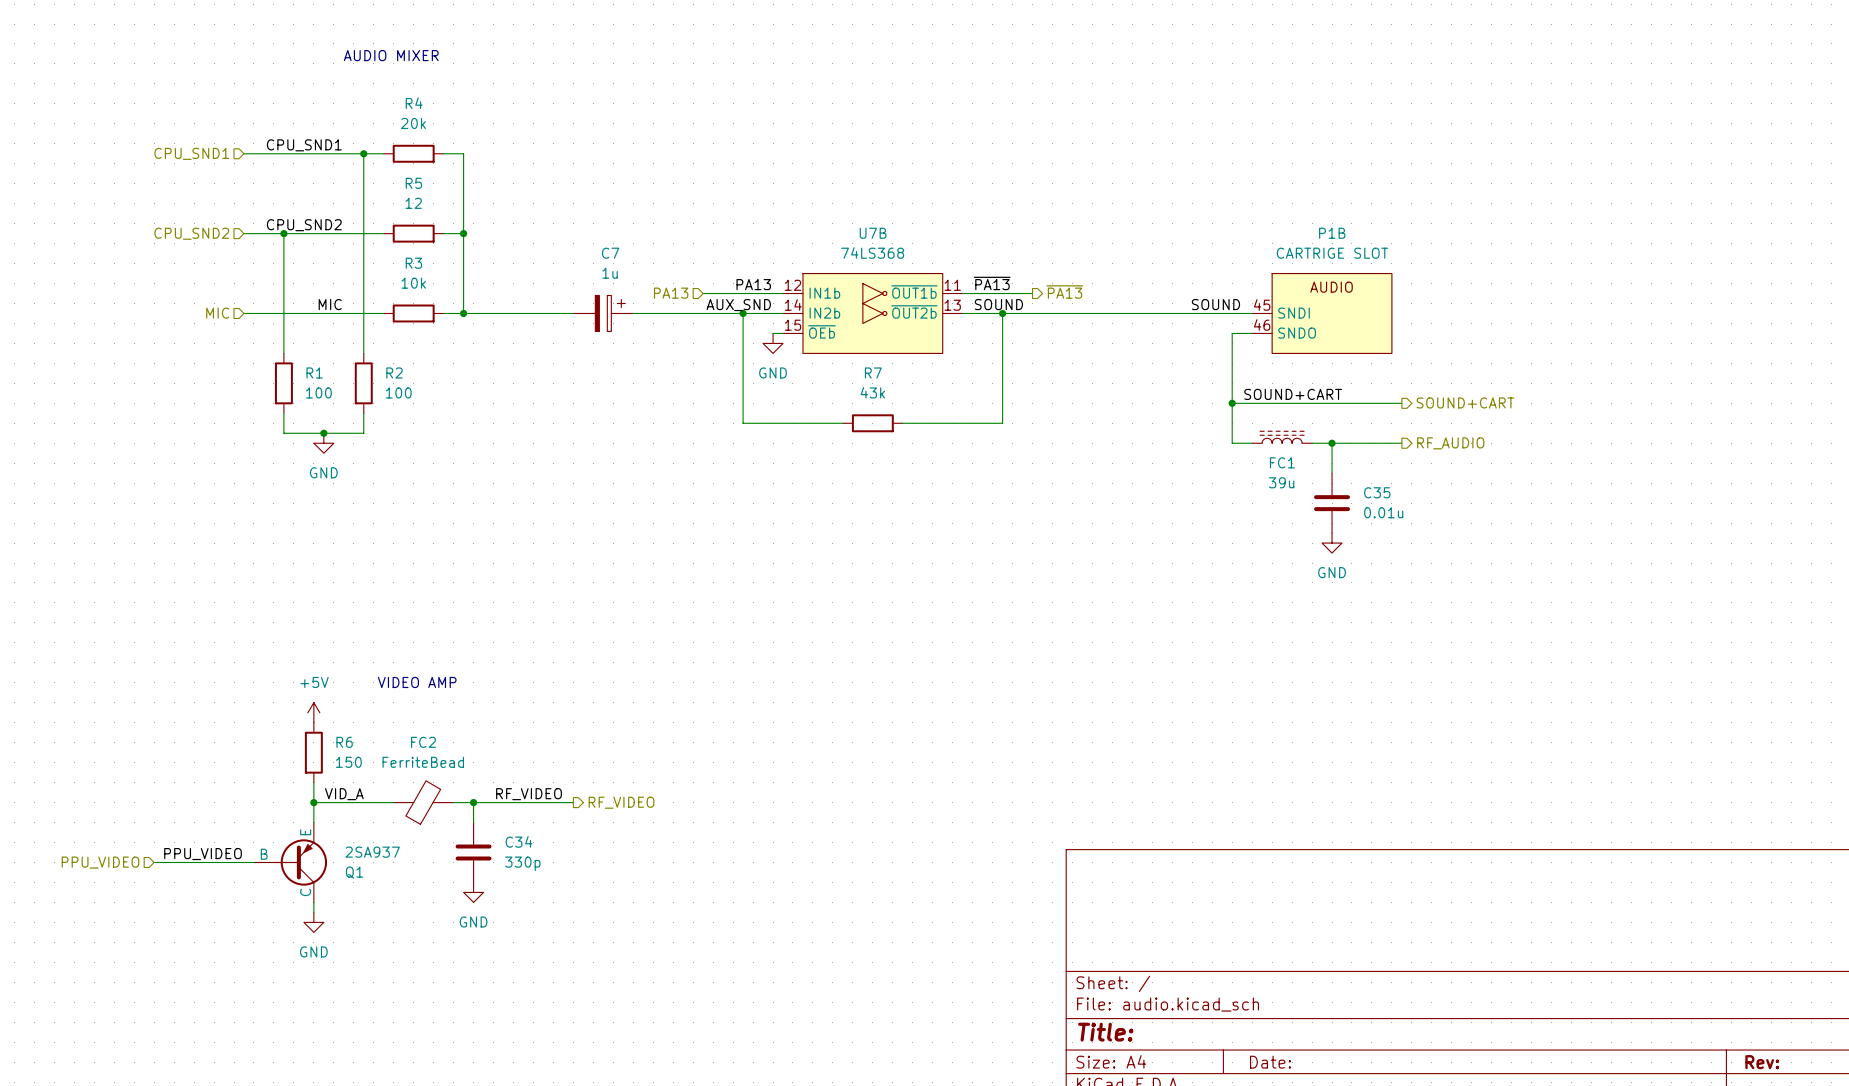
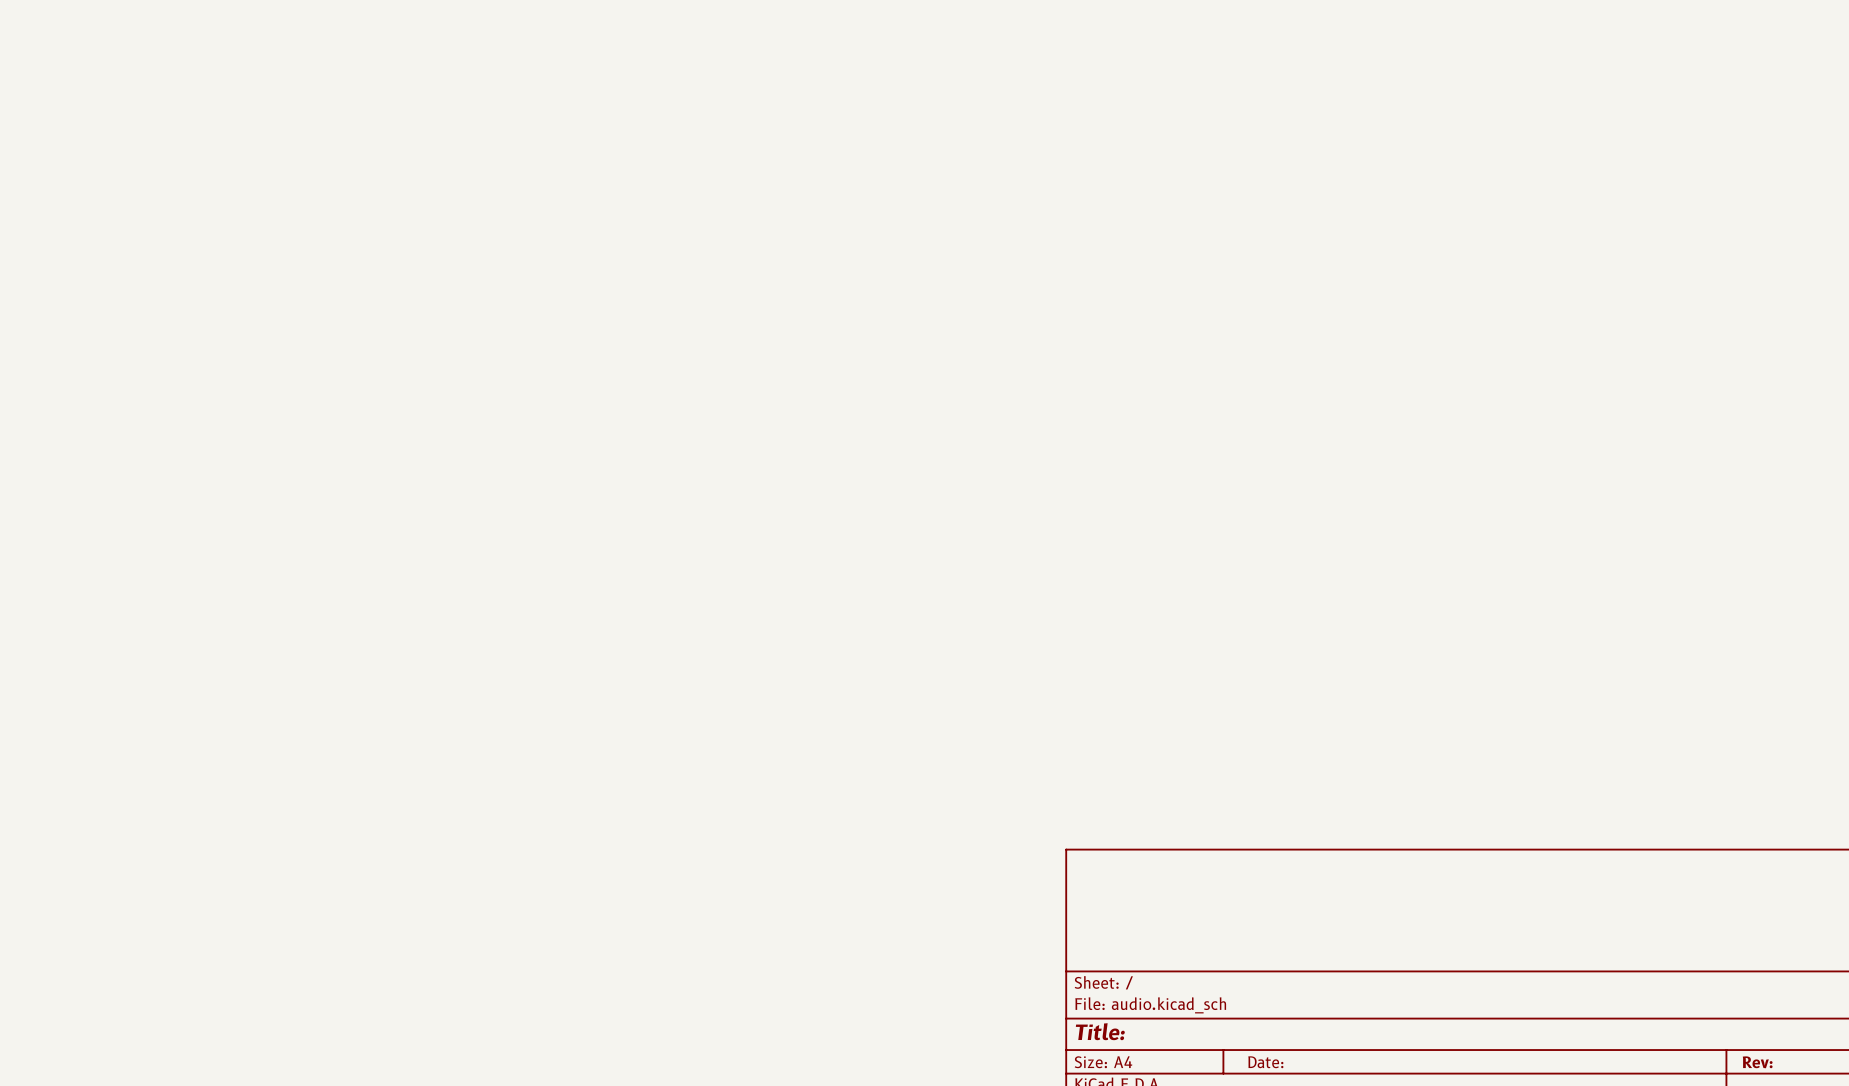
text: AUDIO MIXER (391, 55) -> none
label: CPU_SND1 (304, 145) -> none
hierarchical label: CPU_SND1 (191, 153) -> none
wire: (243, 153) (383, 153) -> none
wire: (363, 153) (363, 353) -> none
junction: (363, 153) -> none
R4: 20k (413, 153) -> none
wire: (443, 153) (463, 153) (463, 313) -> none
label: CPU_SND2 (304, 225) -> none
hierarchical label: CPU_SND2 (191, 233) -> none
wire: (243, 233) (383, 233) -> none
wire: (283, 233) (283, 353) -> none
junction: (283, 233) -> none
R5: 12 (413, 233) -> none
wire: (443, 233) (463, 233) -> none
junction: (463, 233) -> none
label: ~{PA13} (992, 283) -> none
label: PA13 (753, 284) -> none
hierarchical label: ~{PA13} (1064, 291) -> none
hierarchical label: PA13 (671, 293) -> none
wire: (703, 293) (783, 293) -> none
wire: (962, 293) (1032, 293) -> none
label: MIC (330, 304) -> none
label: SOUND (998, 304) -> none
label: SOUND (1215, 304) -> none
label: AUX_SND (738, 305) -> none
hierarchical label: MIC (217, 313) -> none
wire: (243, 313) (383, 313) -> none
R3: 10k (413, 313) -> none
wire: (443, 313) (573, 313) -> none
junction: (463, 313) -> none
C7: 1u (603, 313) -> none
wire: (633, 313) (783, 313) -> none
wire: (743, 313) (743, 423) (842, 423) -> none
junction: (743, 313) -> none
U7B: 74LS368 (872, 313) -> none
wire: (962, 313) (1252, 313) -> none
wire: (1002, 313) (1002, 423) (902, 423) -> none
junction: (1002, 313) -> none
P1B: CARTRIGE SLOT (1322, 313) -> none
wire: (773, 333) (783, 333) -> none
wire: (1252, 333) (1232, 333) (1232, 443) (1252, 443) -> none
power symbol: GND (773, 343) -> none
R1: 100 (283, 383) -> none
R2: 100 (363, 383) -> none
label: SOUND+CART (1293, 394) -> none
hierarchical label: SOUND+CART (1465, 402) -> none
wire: (1232, 403) (1401, 403) -> none
junction: (1232, 403) -> none
wire: (283, 413) (283, 433) (363, 433) (363, 413) -> none
R7: 43k (872, 423) -> none
junction: (323, 433) -> none
FC1: 39u (1282, 437) -> none
power symbol: GND (323, 443) -> none
wire: (1312, 443) (1401, 443) -> none
wire: (1332, 443) (1332, 473) -> none
junction: (1332, 443) -> none
hierarchical label: RF_AUDIO (1450, 443) -> none
C35: 0.01u (1332, 503) -> none
power symbol: GND (1332, 543) -> none
text: VIDEO AMP (417, 682) -> none
power symbol: +5V (313, 712) -> none
R6: 150 (313, 752) -> none
wire: (313, 782) (313, 822) -> none
label: VID_A (344, 794) -> none
label: RF_VIDEO (529, 794) -> none
wire: (313, 802) (393, 802) -> none
junction: (313, 802) -> none
FC2: FerriteBead (423, 802) -> none
wire: (453, 802) (573, 802) -> none
wire: (473, 802) (473, 822) -> none
junction: (473, 802) -> none
hierarchical label: RF_VIDEO (621, 802) -> none
C34: 330p (473, 852) -> none
label: PPU_VIDEO (203, 854) -> none
hierarchical label: PPU_VIDEO (100, 862) -> none
wire: (154, 862) (253, 862) -> none
Q1: 2SA937 (290, 862) -> none
power symbol: GND (473, 892) -> none
wire: (313, 902) (313, 912) -> none
power symbol: GND (313, 922) -> none

